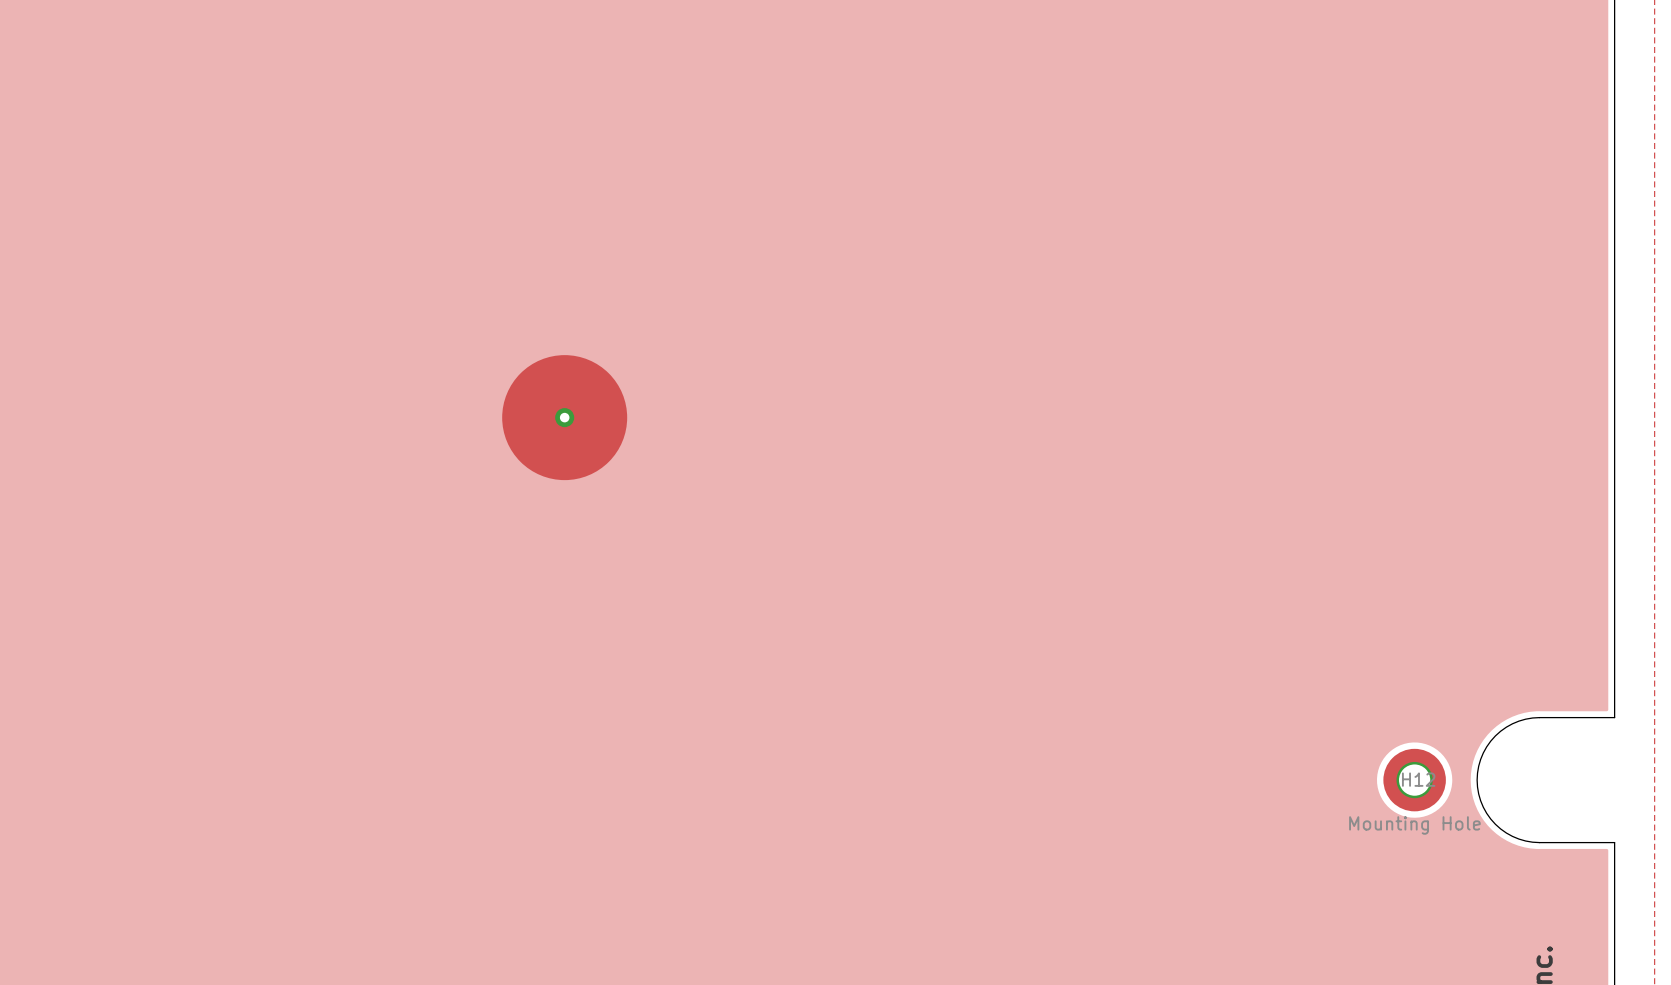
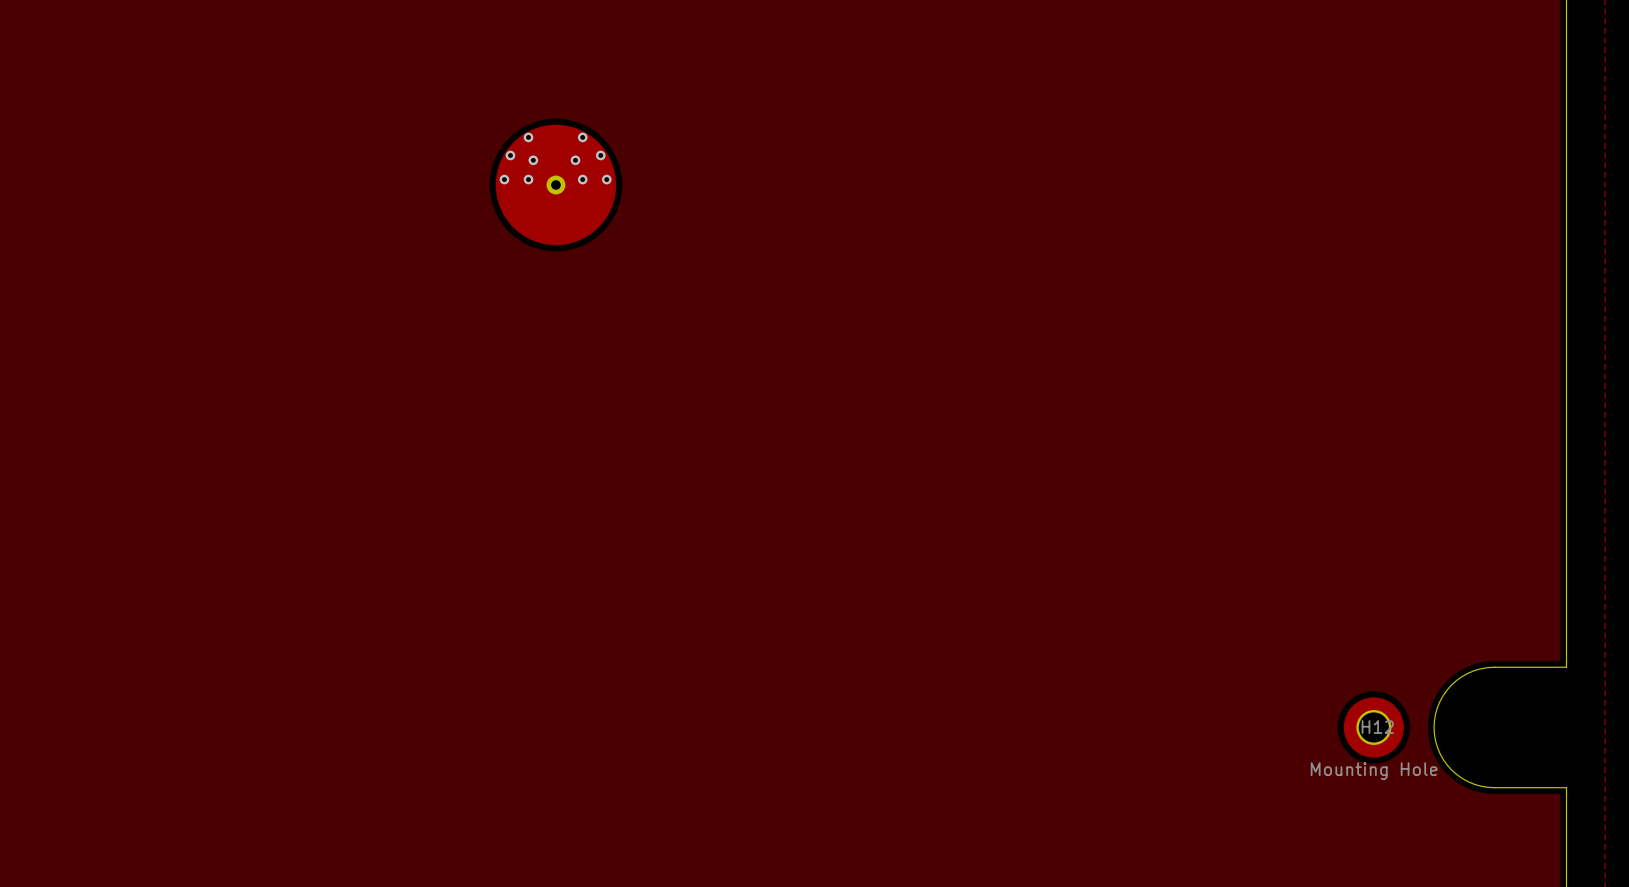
via: none -> (528, 137)
via: none -> (582, 137)
via: none -> (510, 155)
via: none -> (600, 155)
via: none -> (533, 160)
via: none -> (575, 160)
via: none -> (504, 179)
via: none -> (528, 179)
via: none -> (582, 179)
via: none -> (606, 179)
part: none -> (555, 184)
part: (564, 417) -> none

